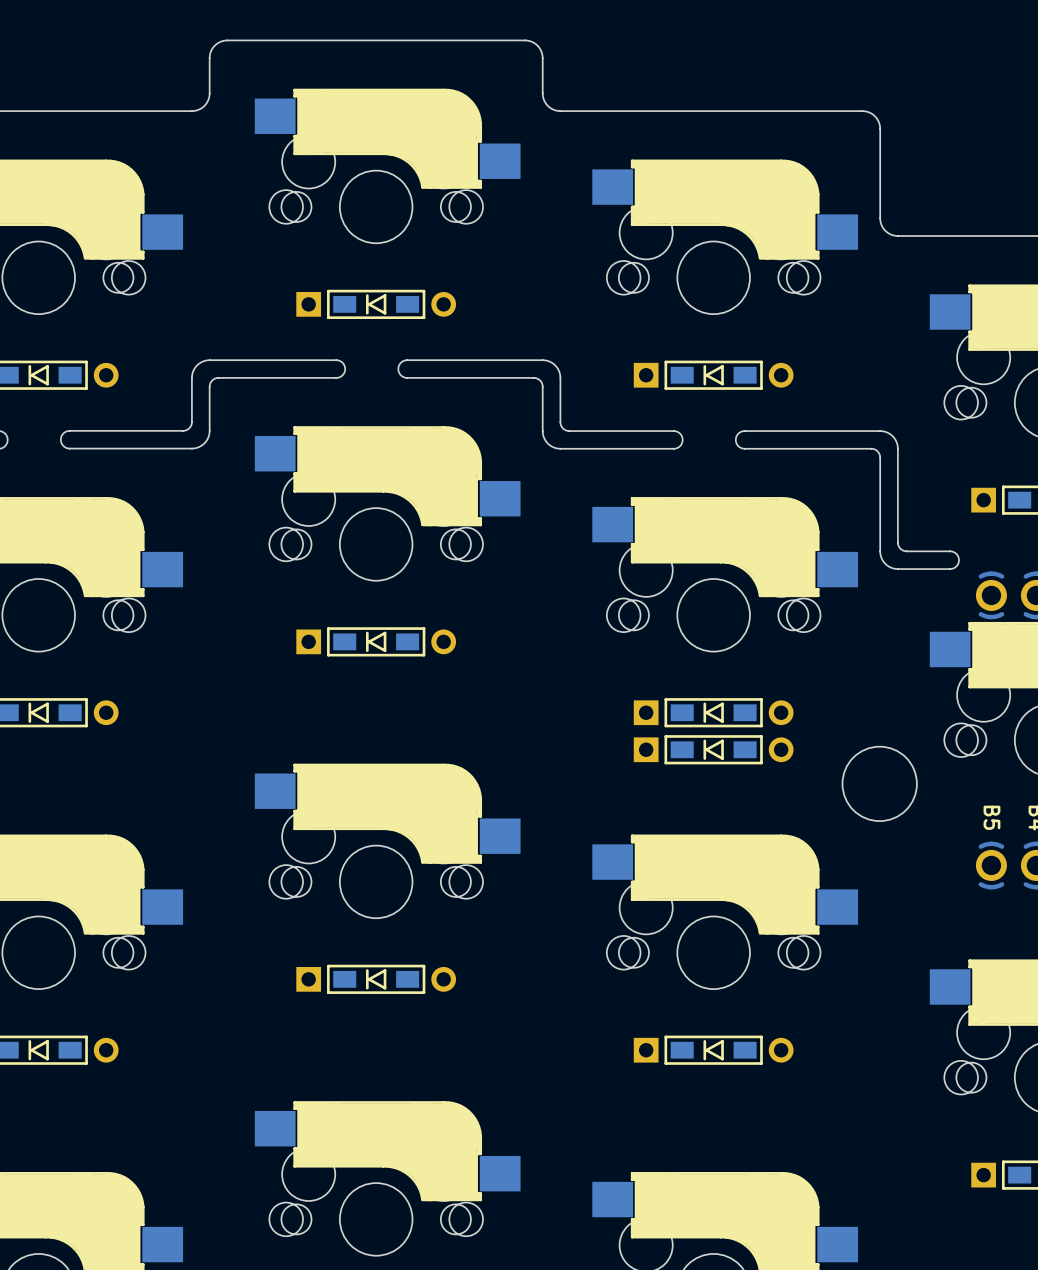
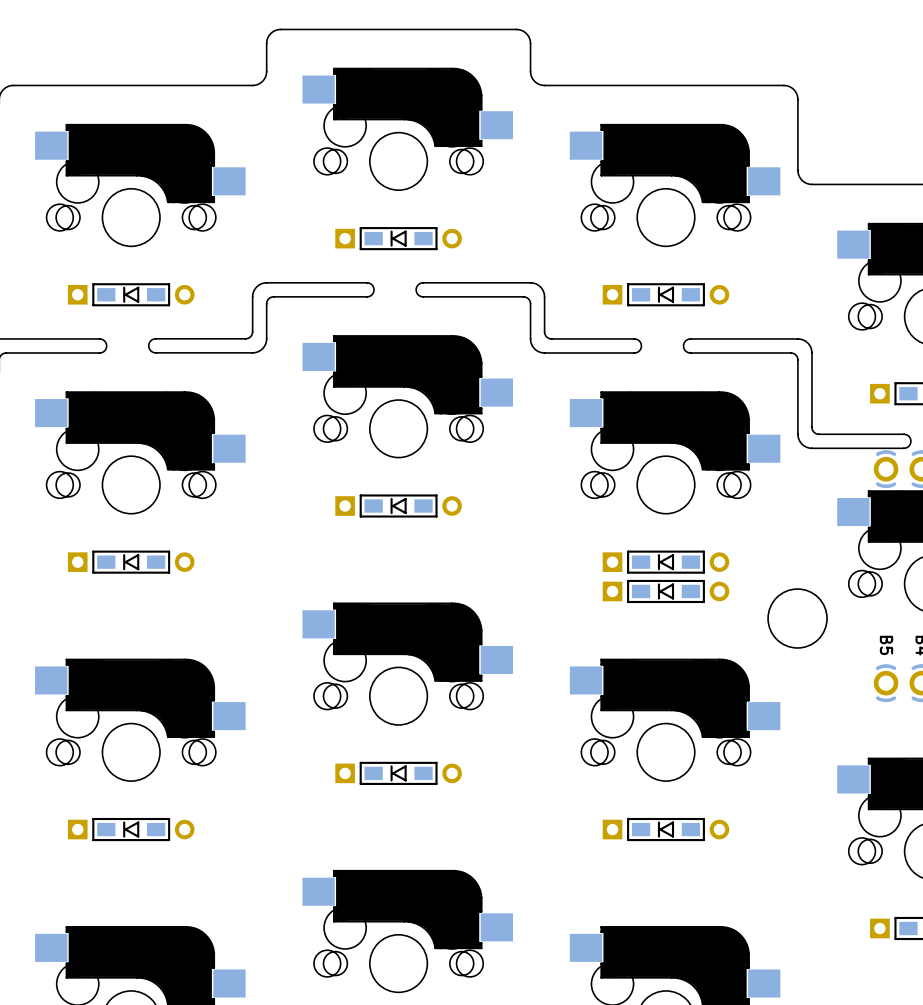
board edge: (950, 551) (956, 553) (959, 560) (956, 566) (950, 569) -> (853, 434) (904, 434) (908, 436) (910, 441) (908, 446) (904, 448) (853, 448)

